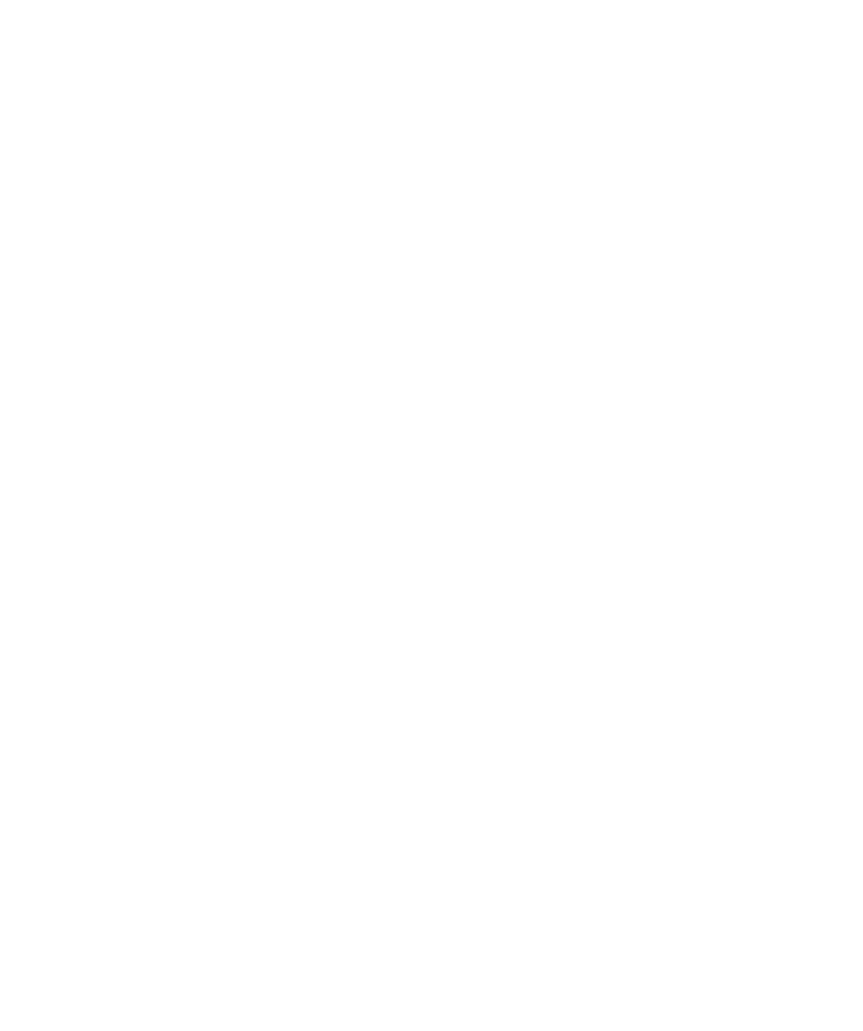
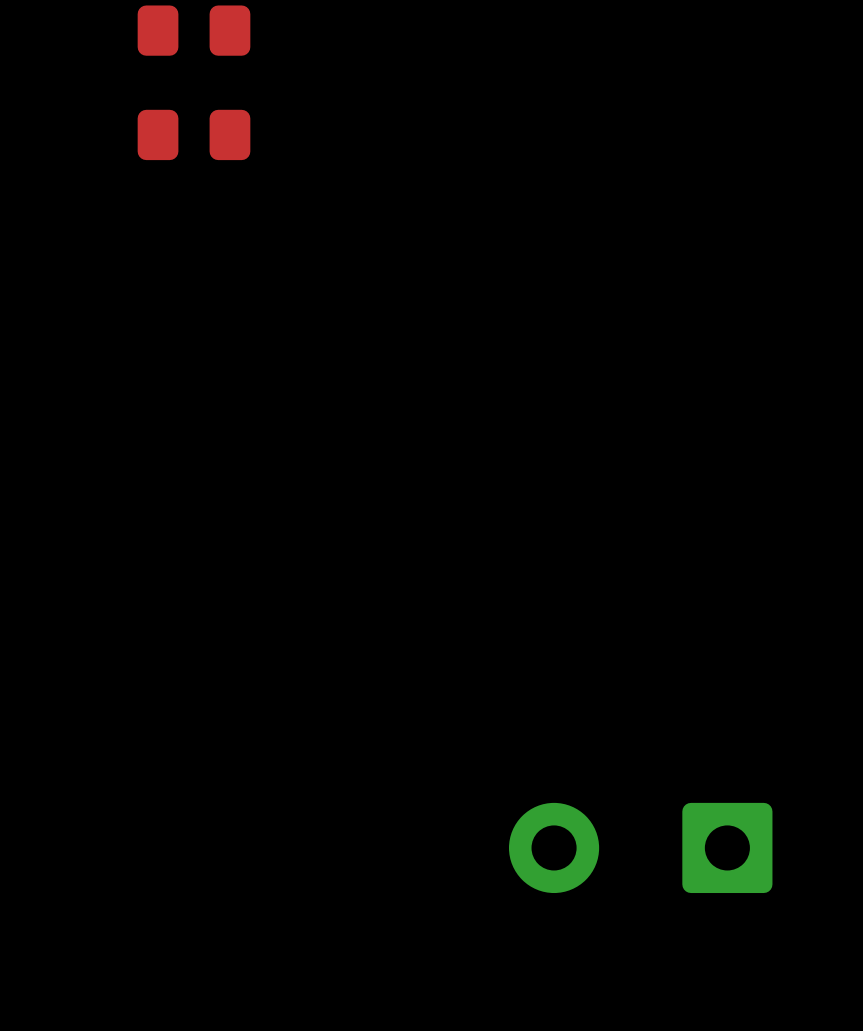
part: none -> (193, 30)
part: none -> (193, 134)
part: none -> (640, 847)

